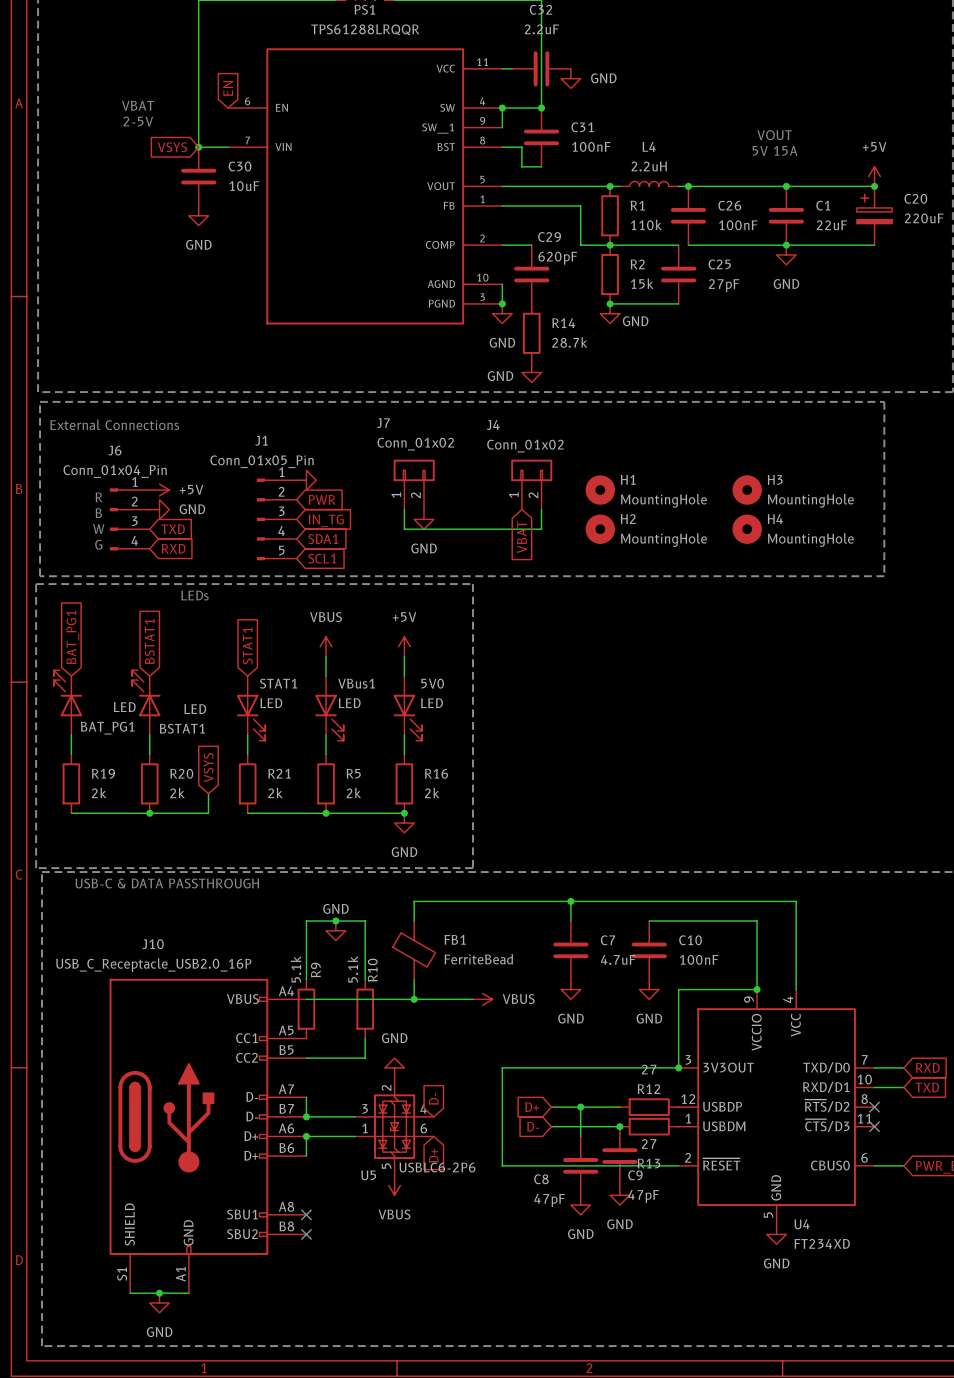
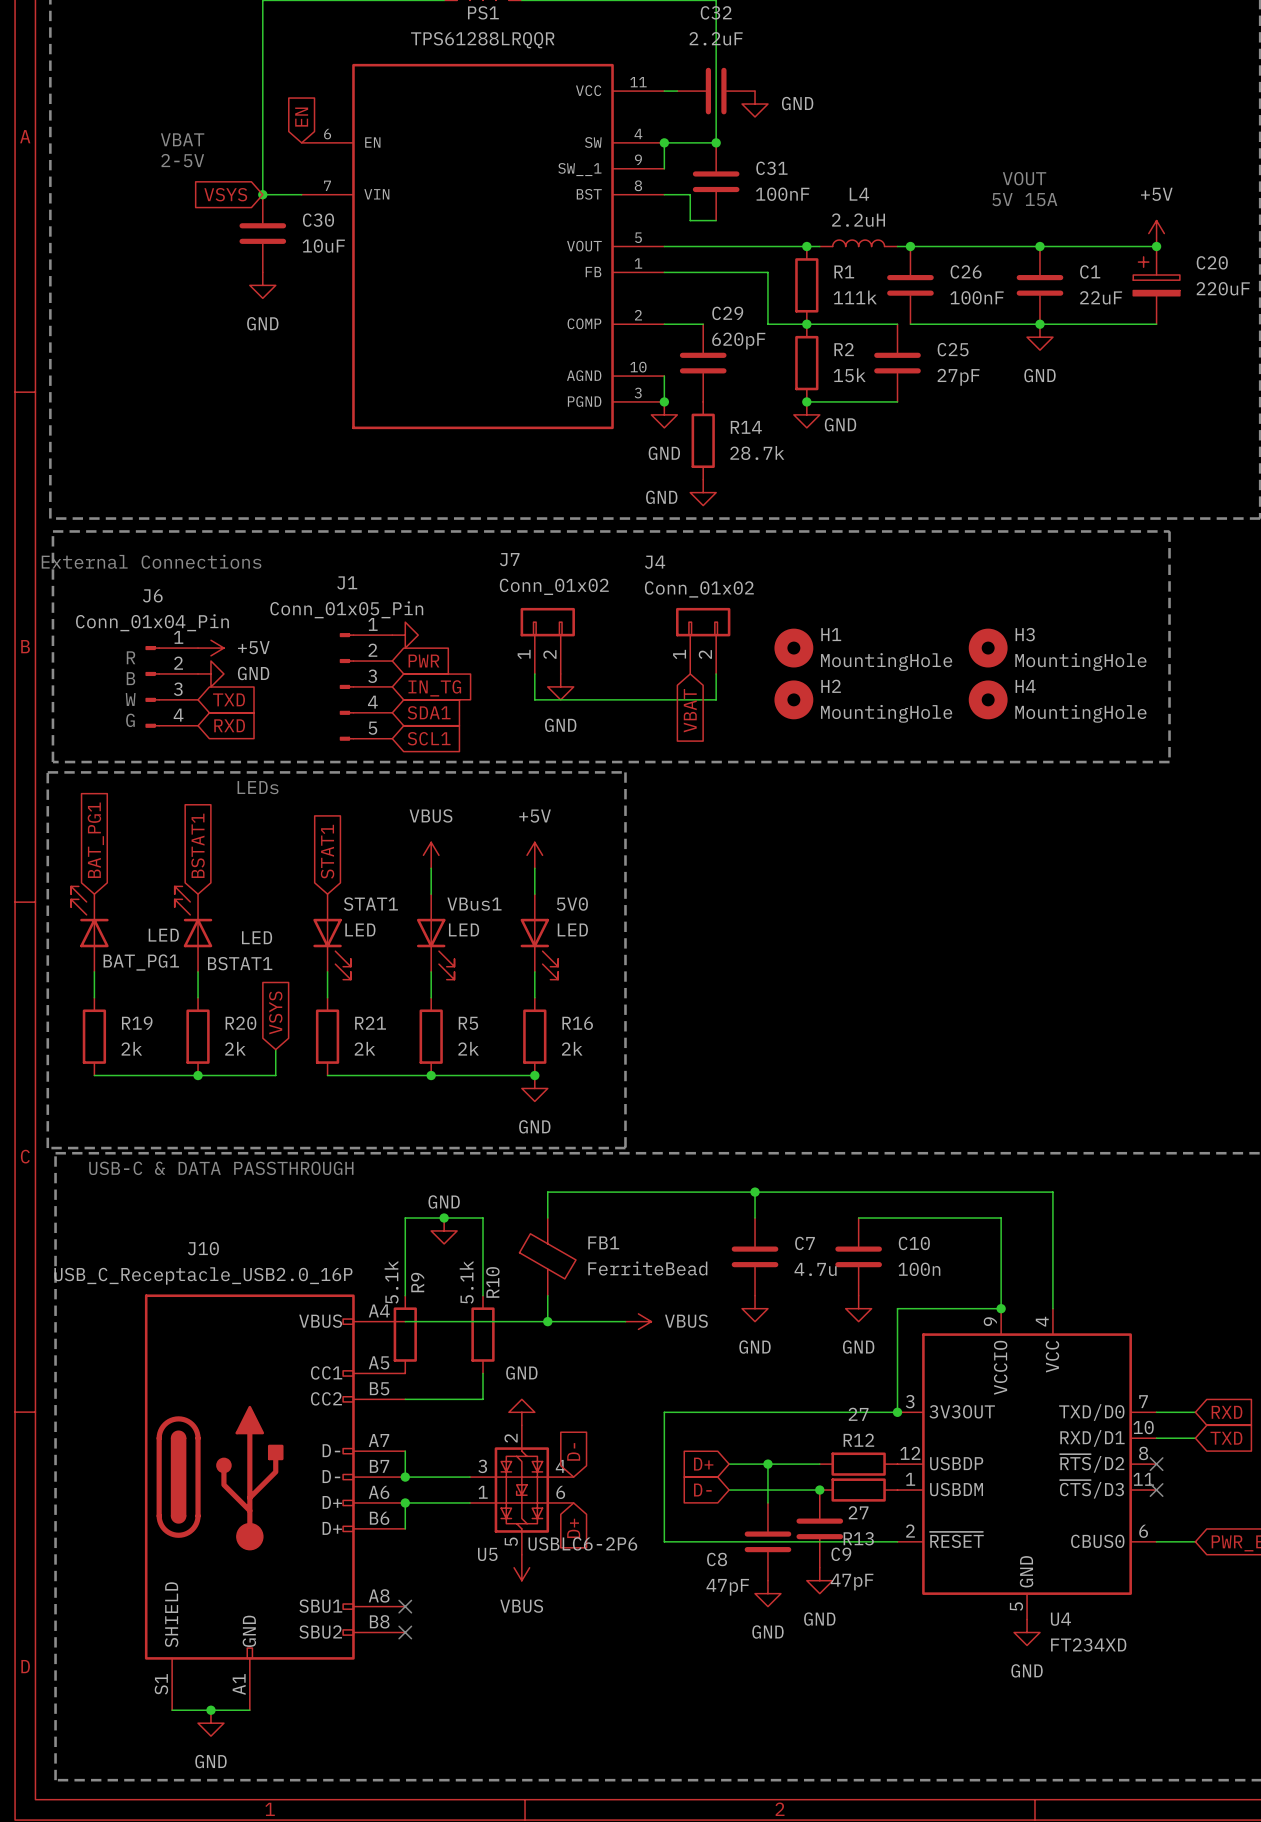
R1 value: 110k (646, 224) -> 111k (855, 297)
C7 value: 4.7uF (618, 959) -> 4.7u (815, 1269)
C10 value: 100nF (699, 959) -> 100n (919, 1269)

